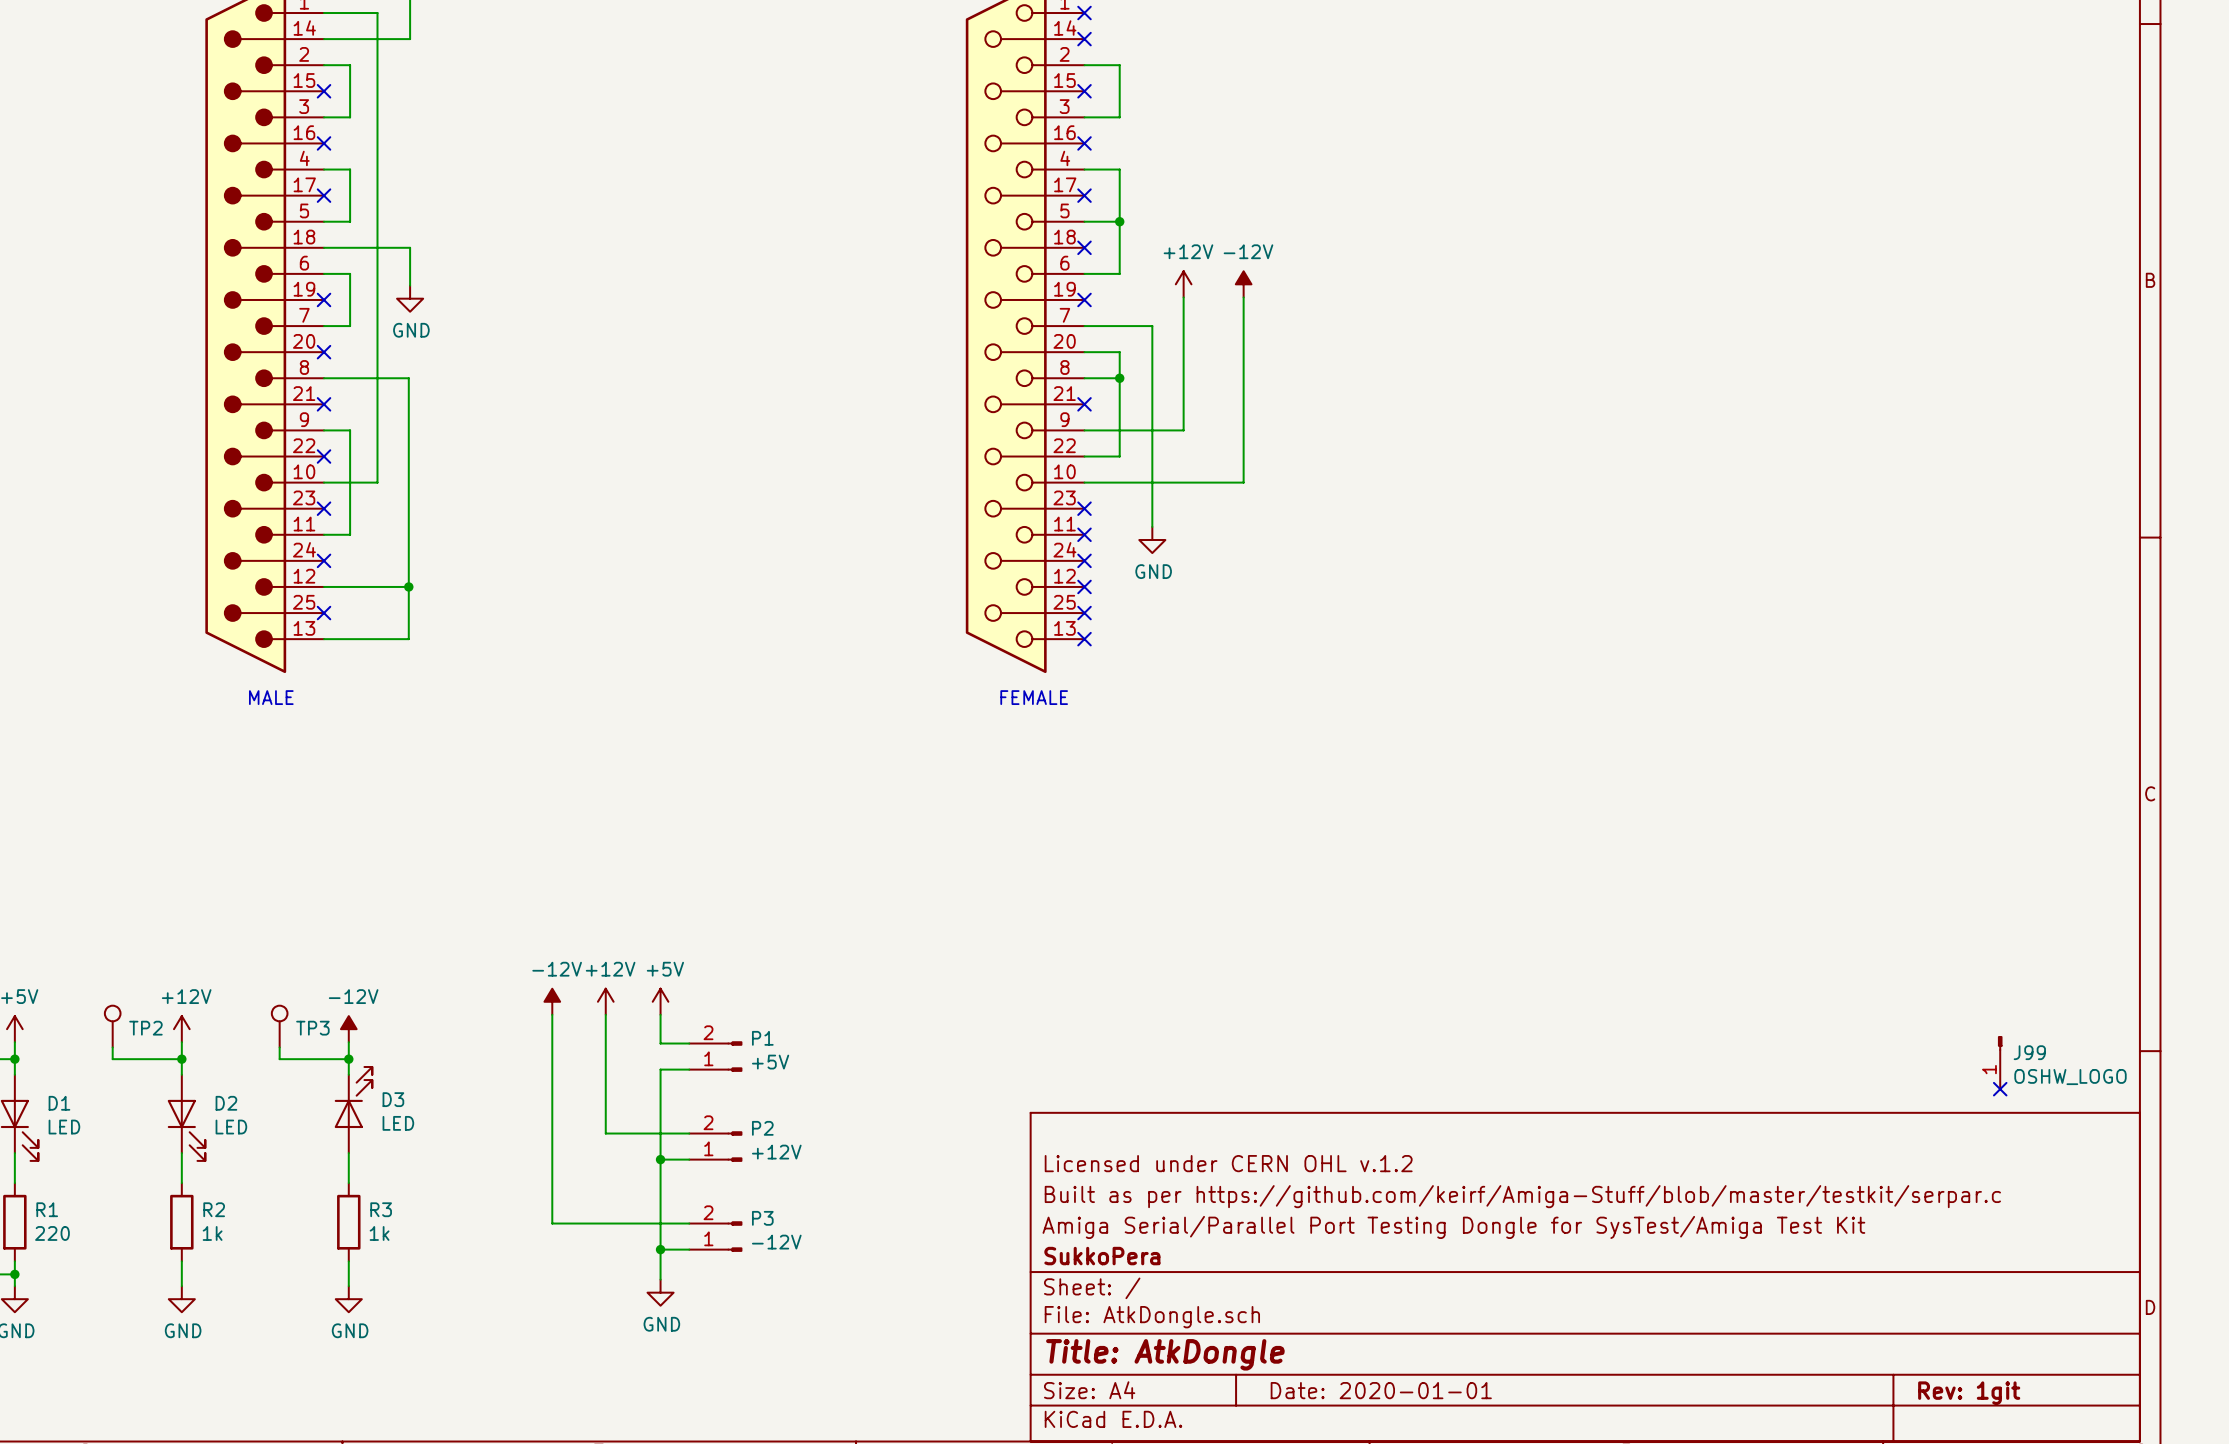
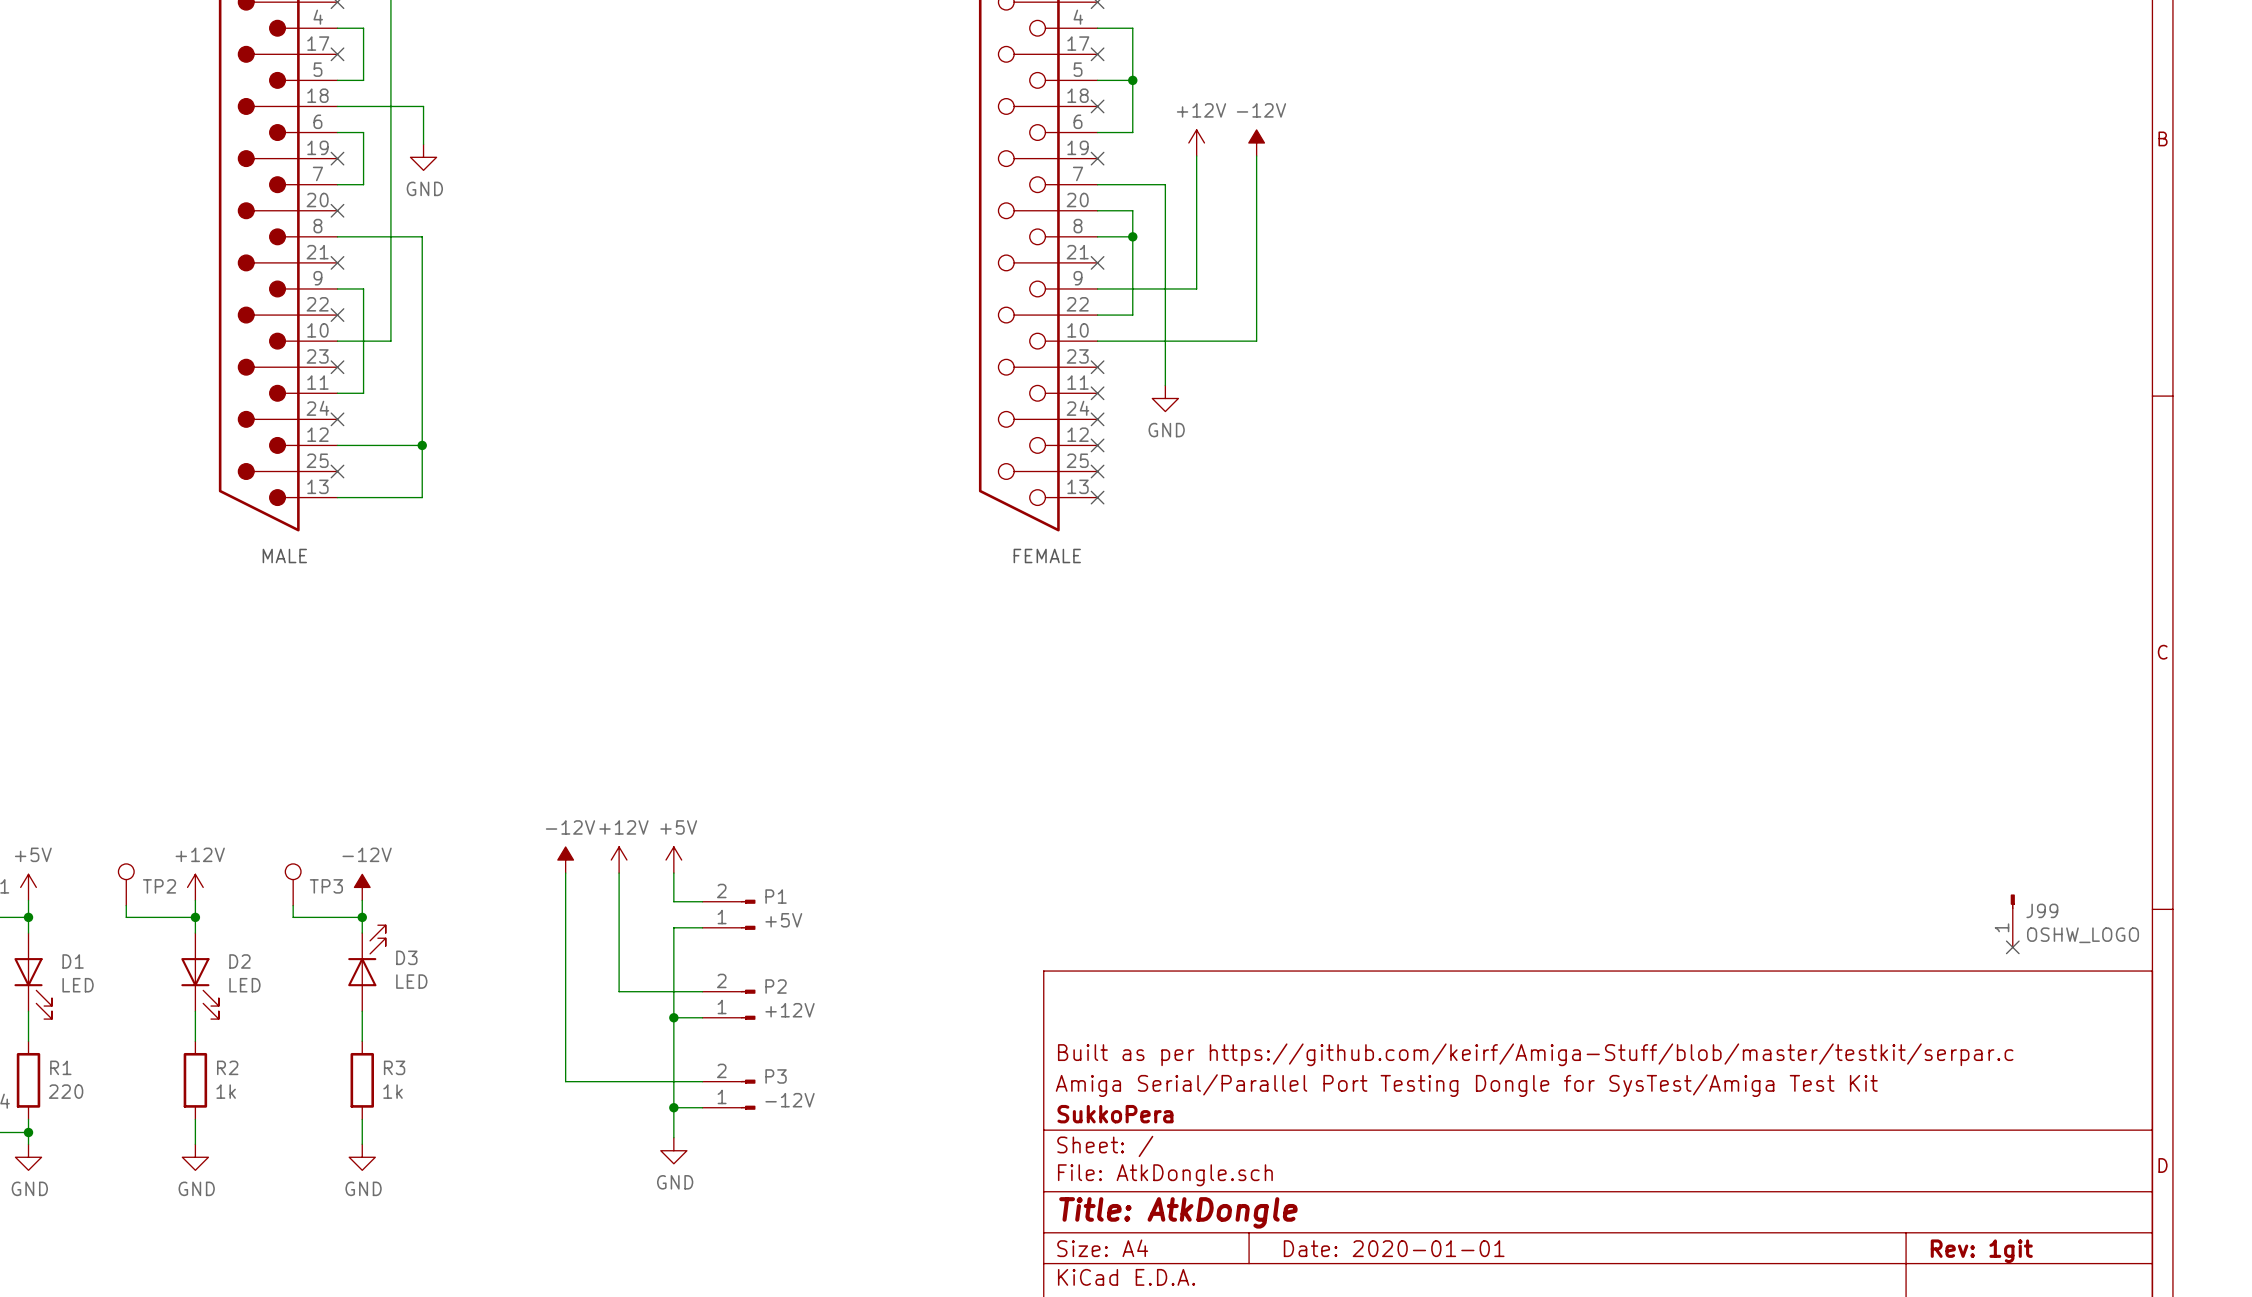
title block: Licensed under CERN OHL v.1.2 (1228, 1163) -> none

